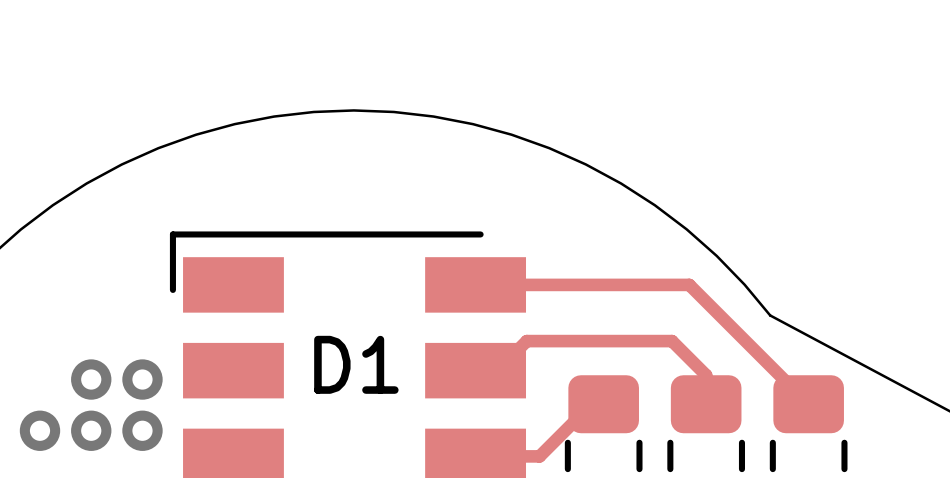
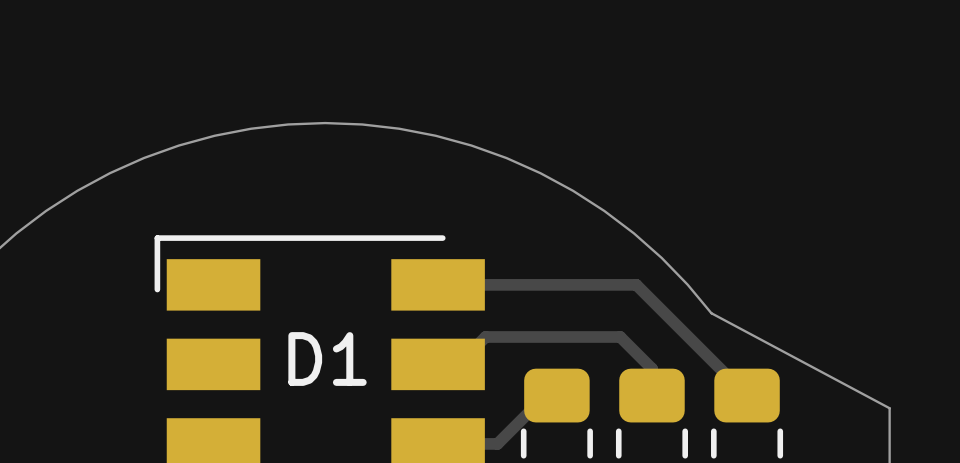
via: (91, 379) -> none
via: (142, 379) -> none
via: (39, 430) -> none
via: (91, 430) -> none
via: (142, 430) -> none

